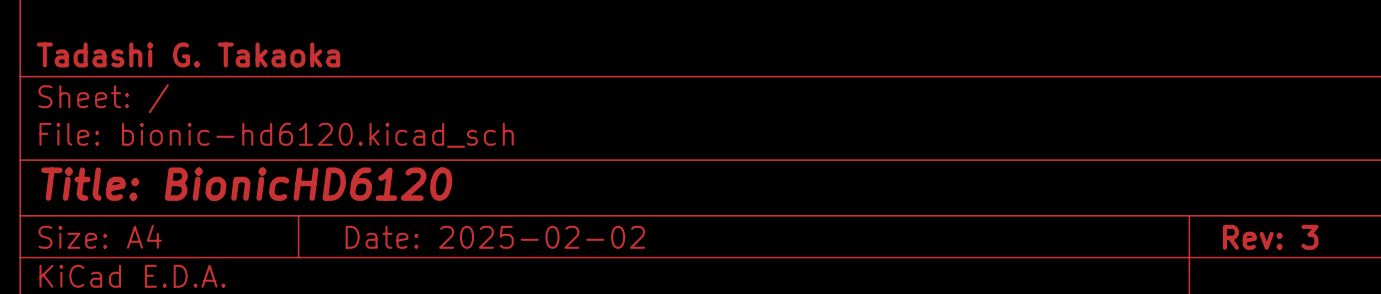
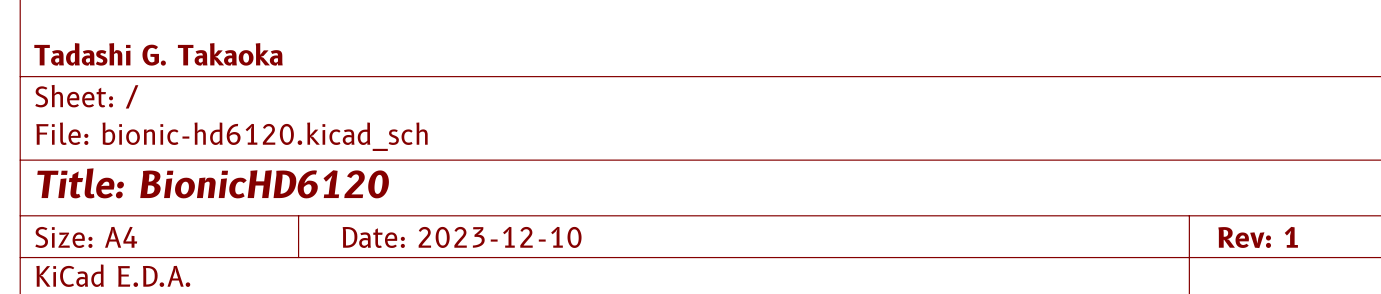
title block: Date: 2025-02-02 (495, 237) -> Date: 2023-12-10 (462, 237)
title block: Rev: 3 (1270, 237) -> Rev: 1 (1258, 237)

